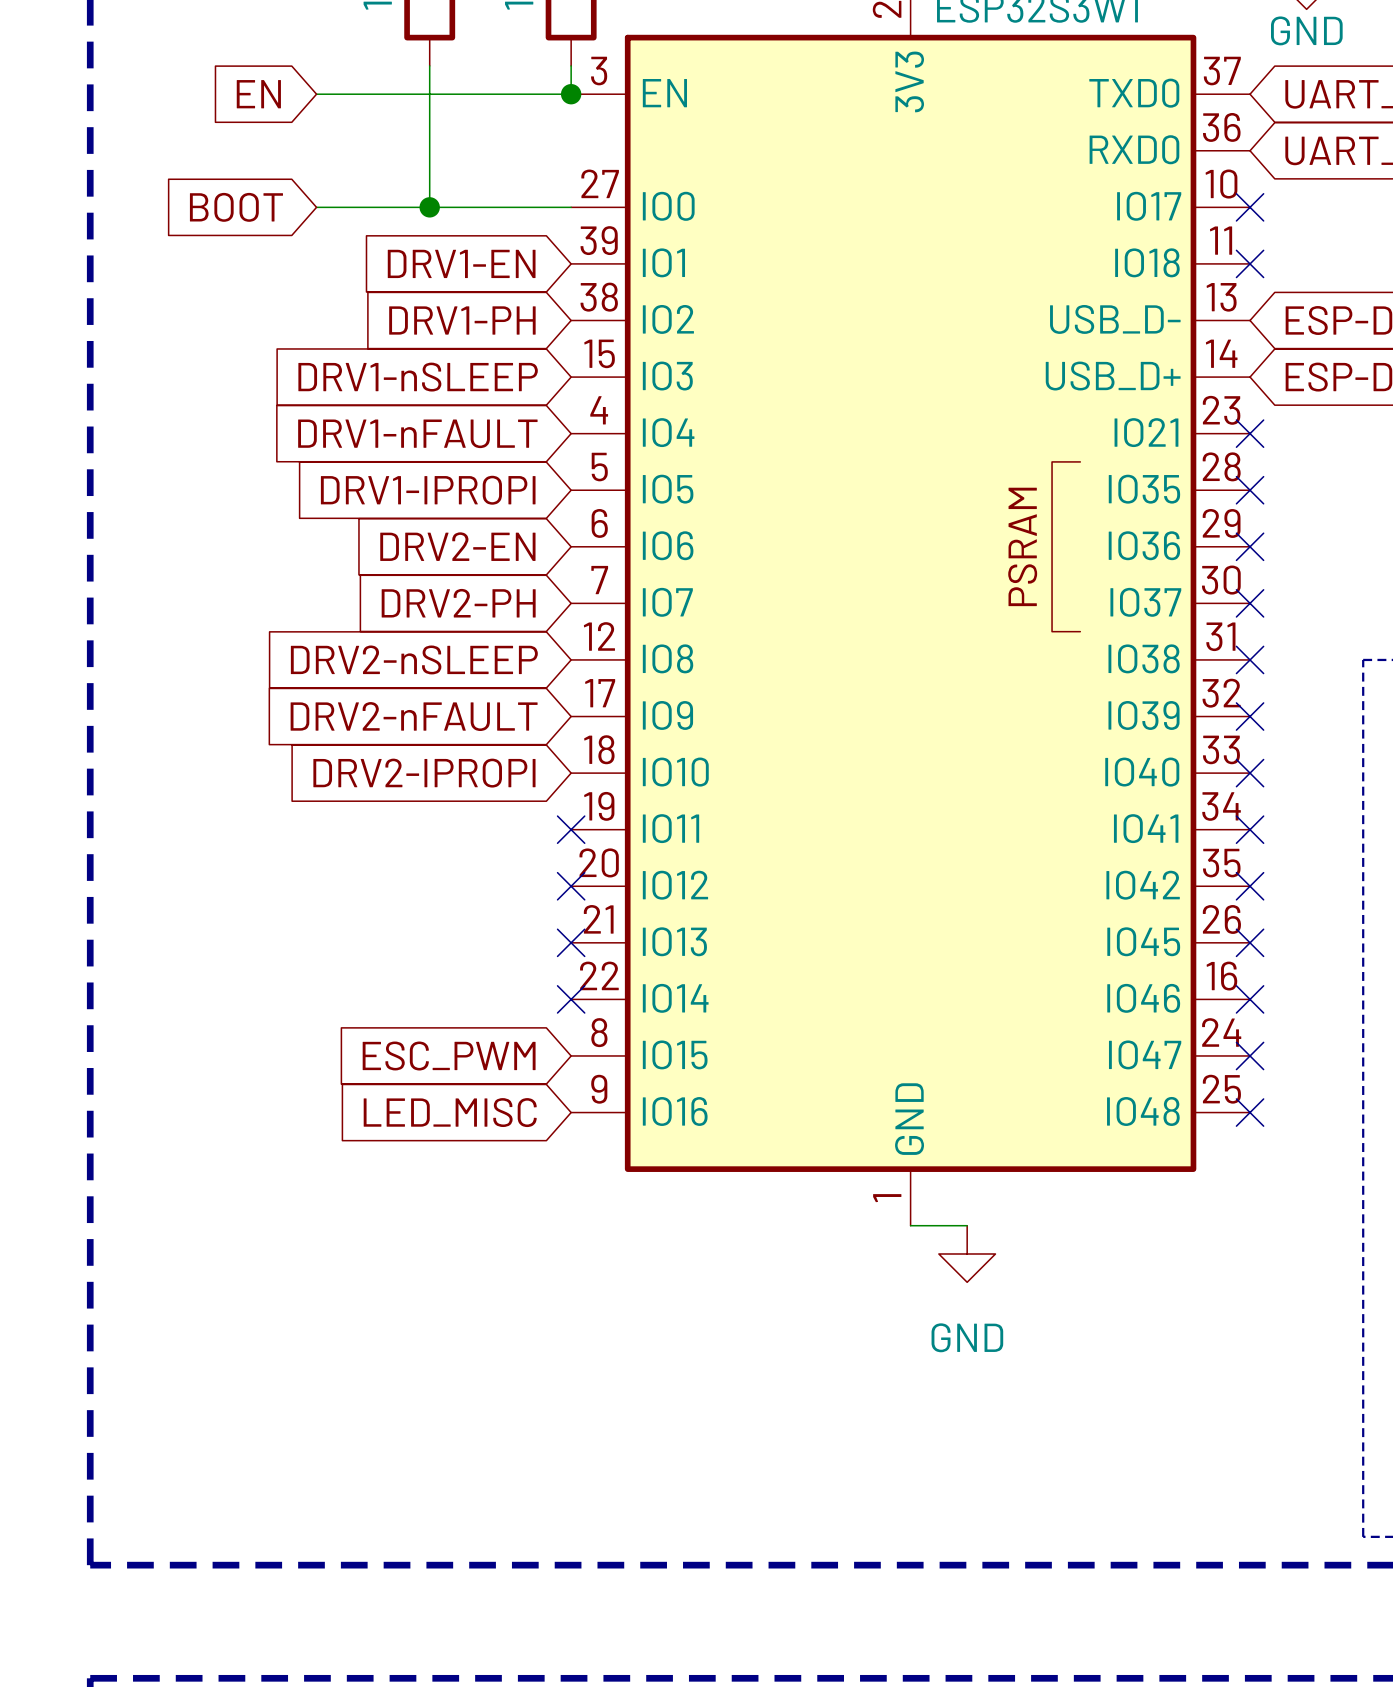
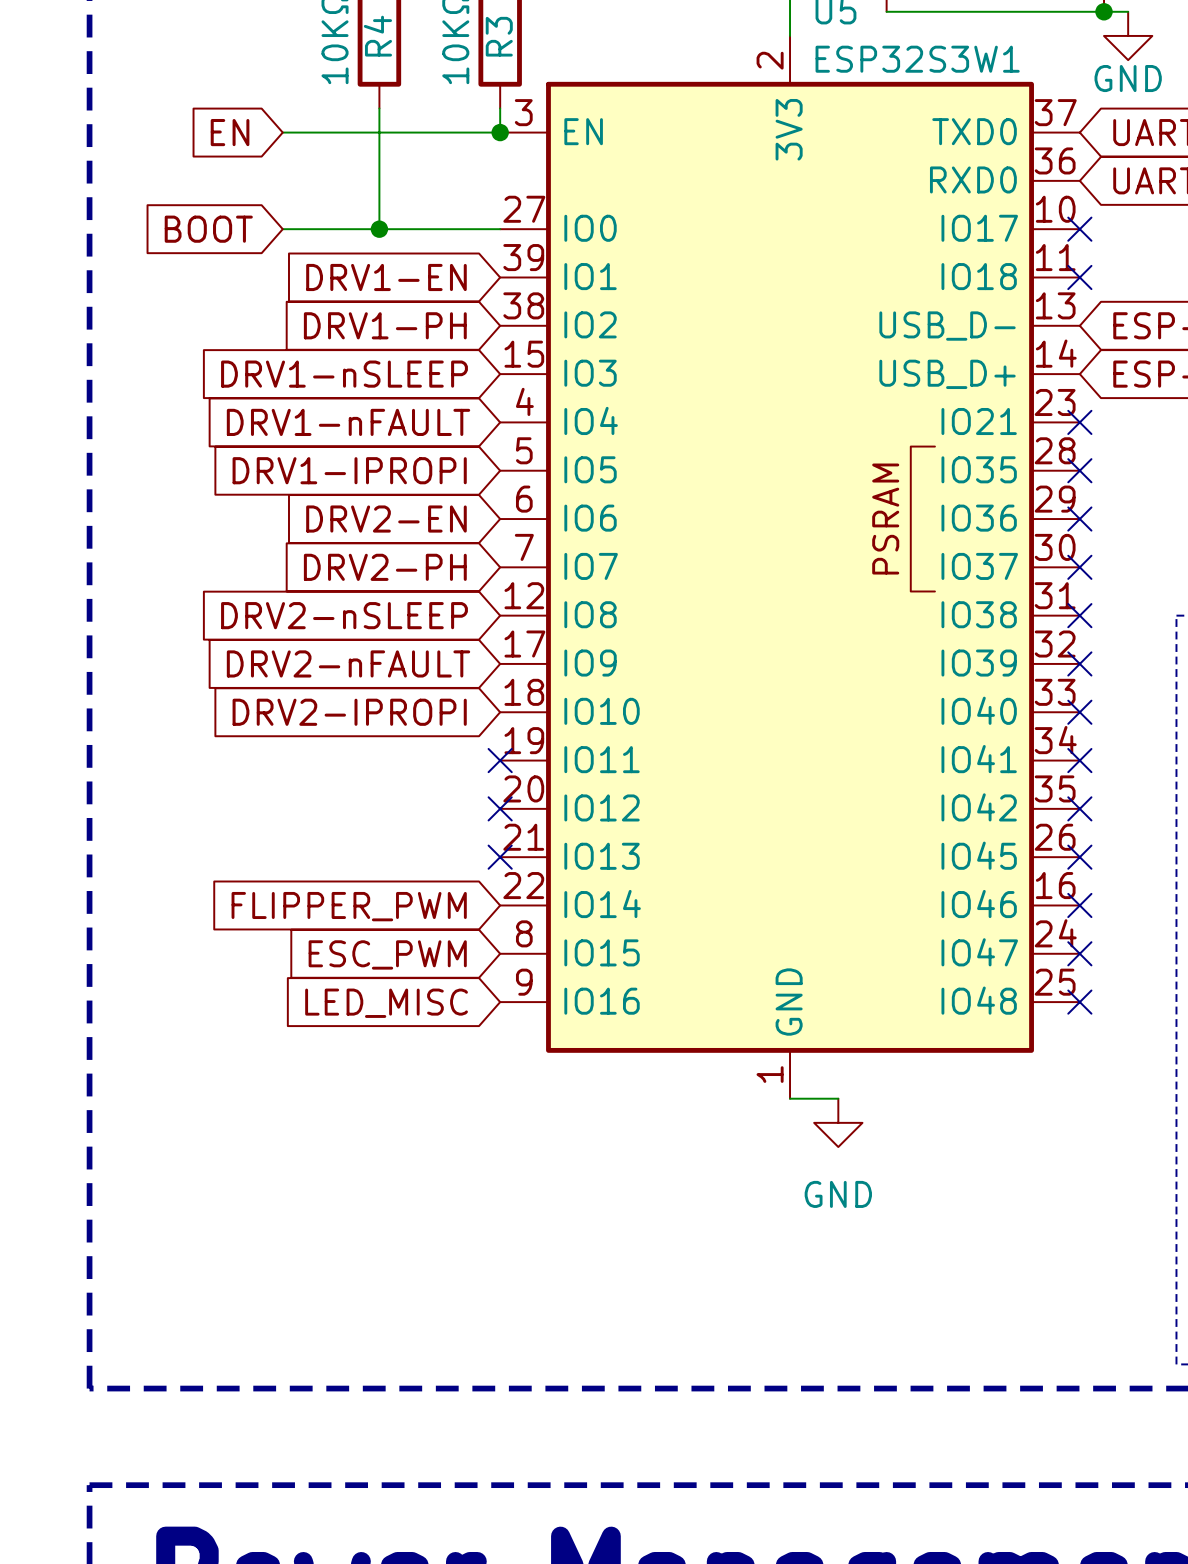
global label: none -> FLIPPER_PWM (349, 906)
no-connect mark: (571, 999) -> none

